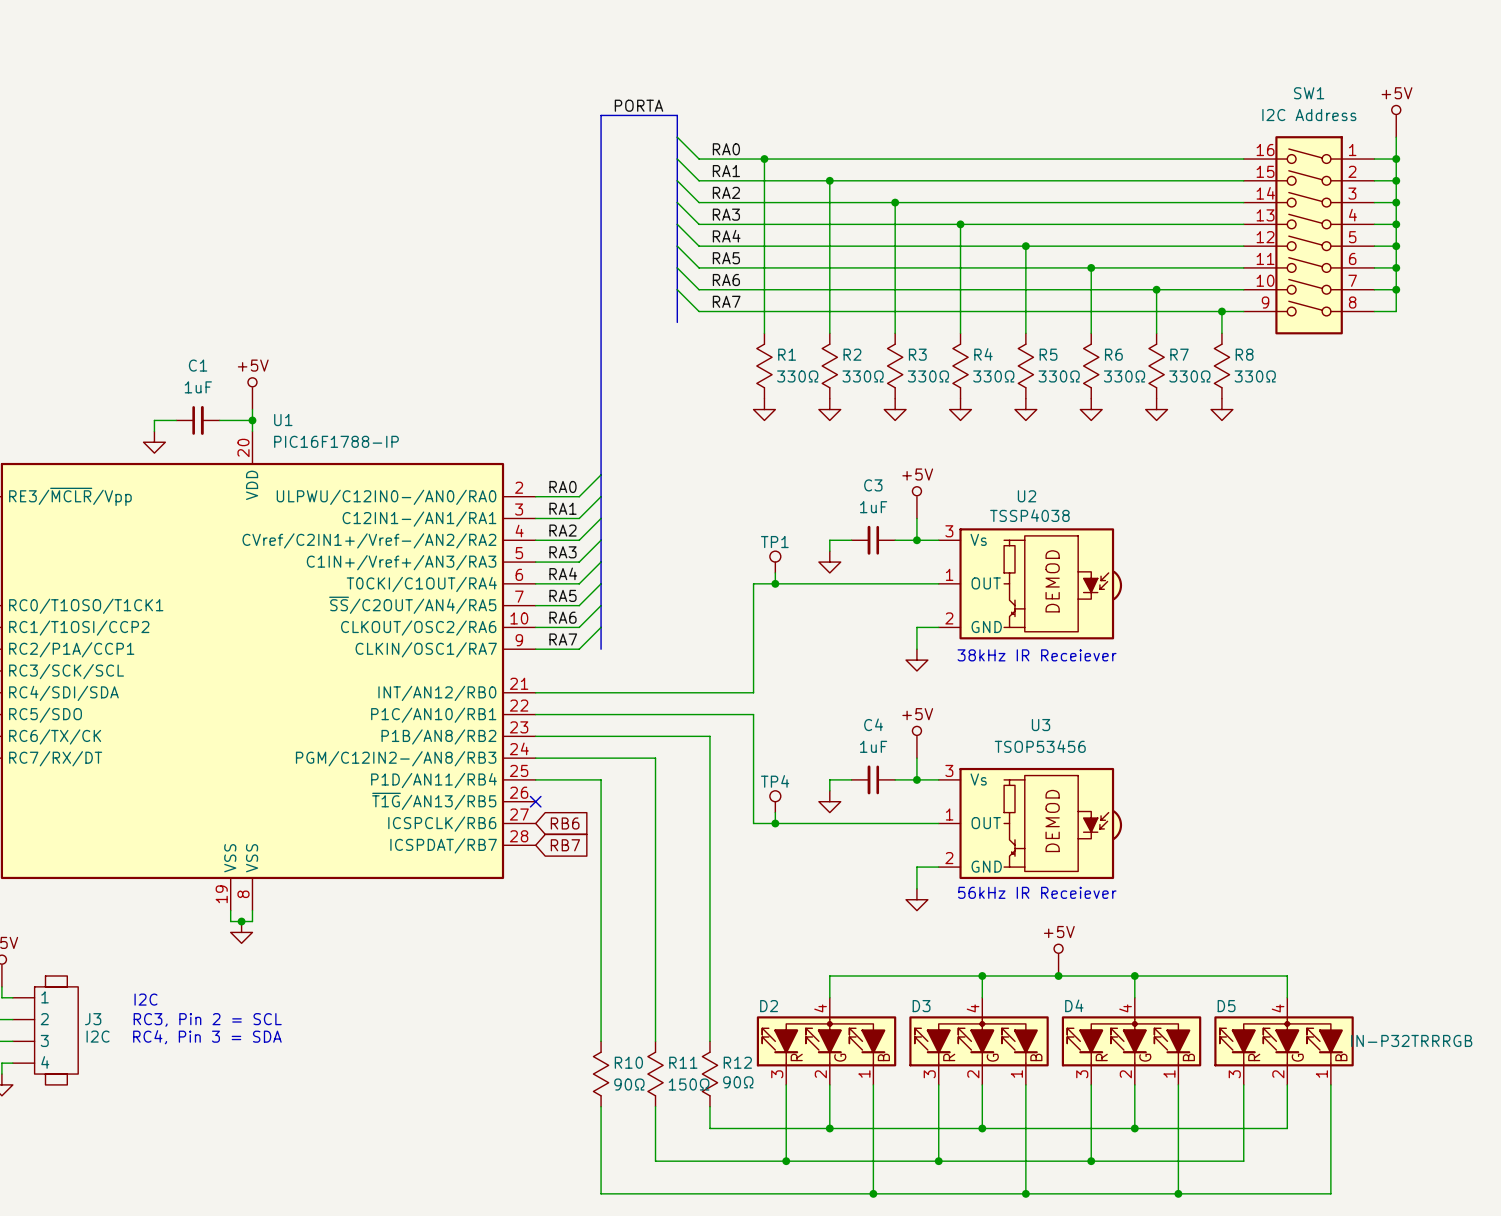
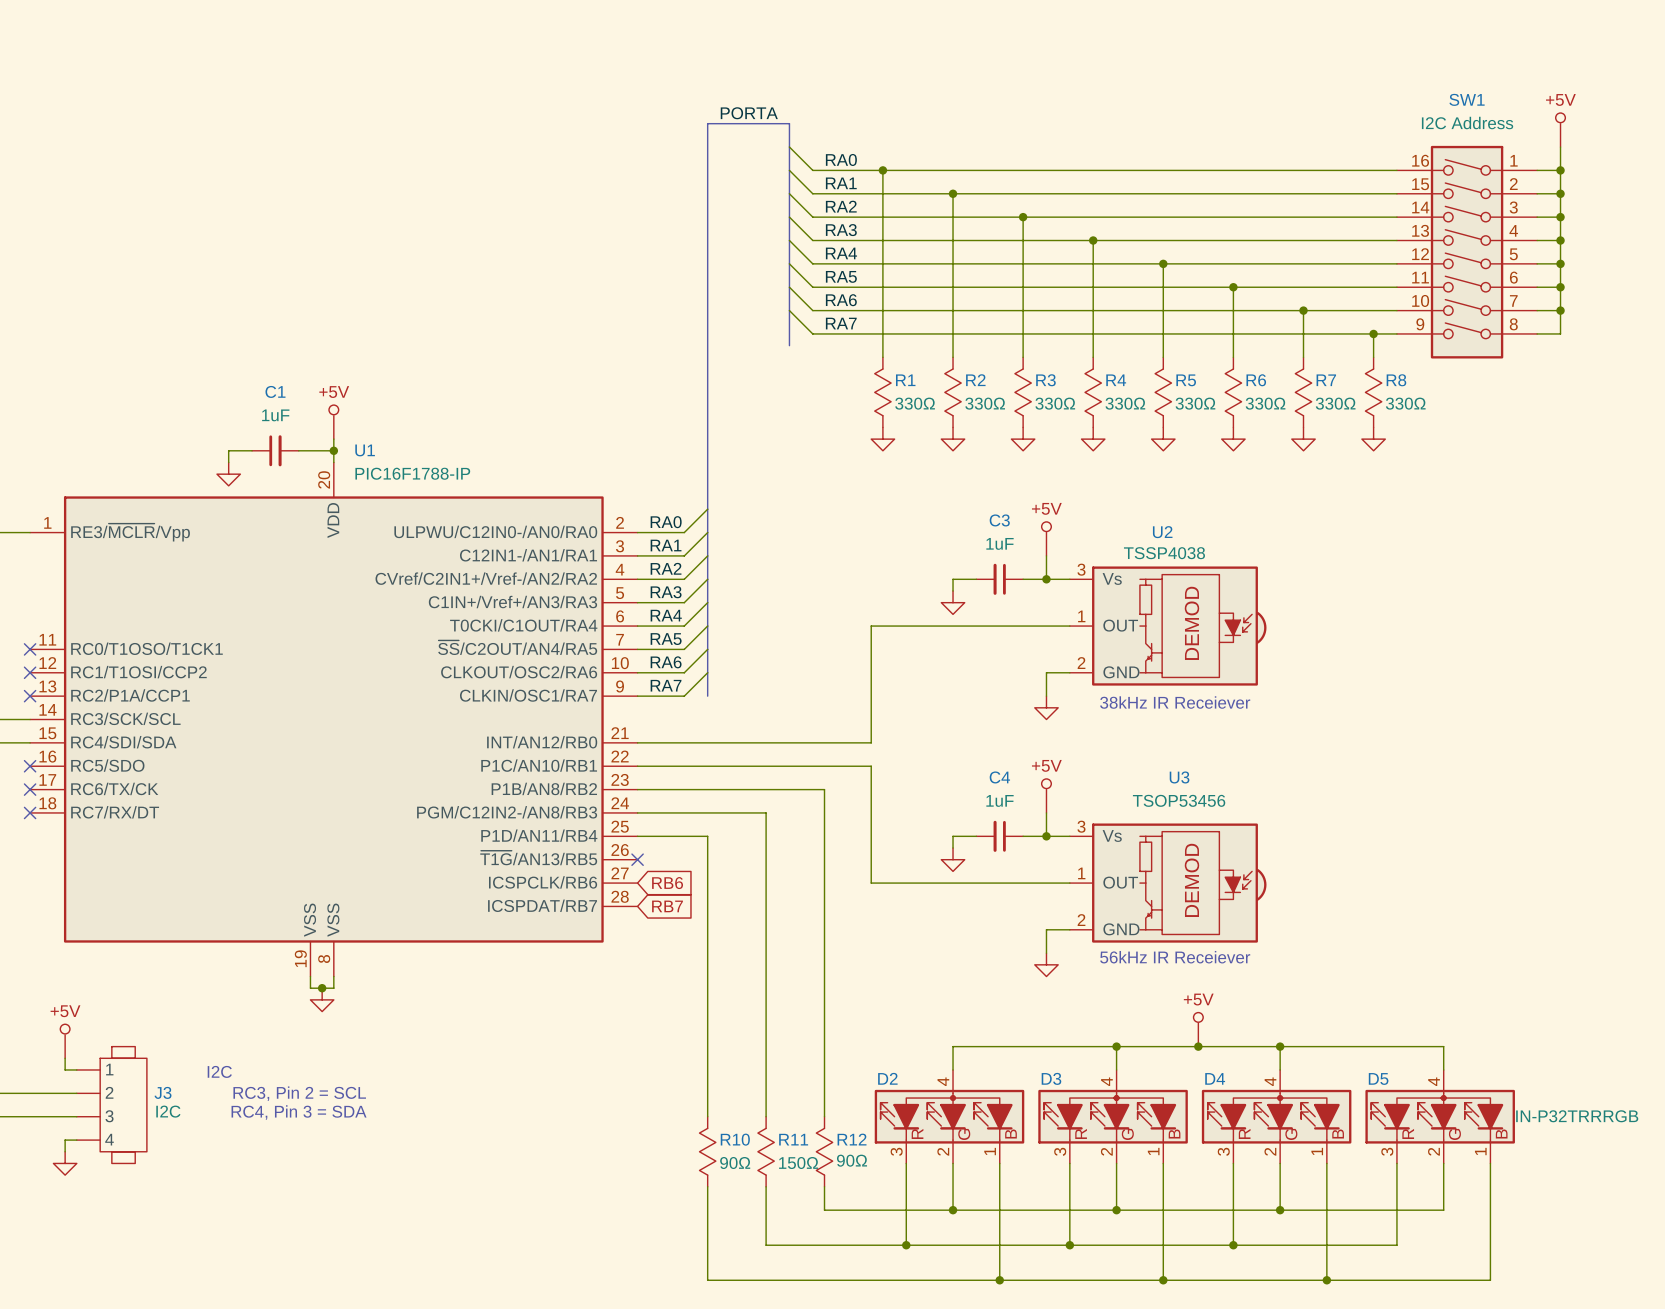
TP1: (775, 562) -> none
wire: (775, 572) (775, 583) -> none
junction: (775, 583) -> none
TP4: (775, 801) -> none
wire: (775, 812) (775, 823) -> none
junction: (775, 823) -> none

